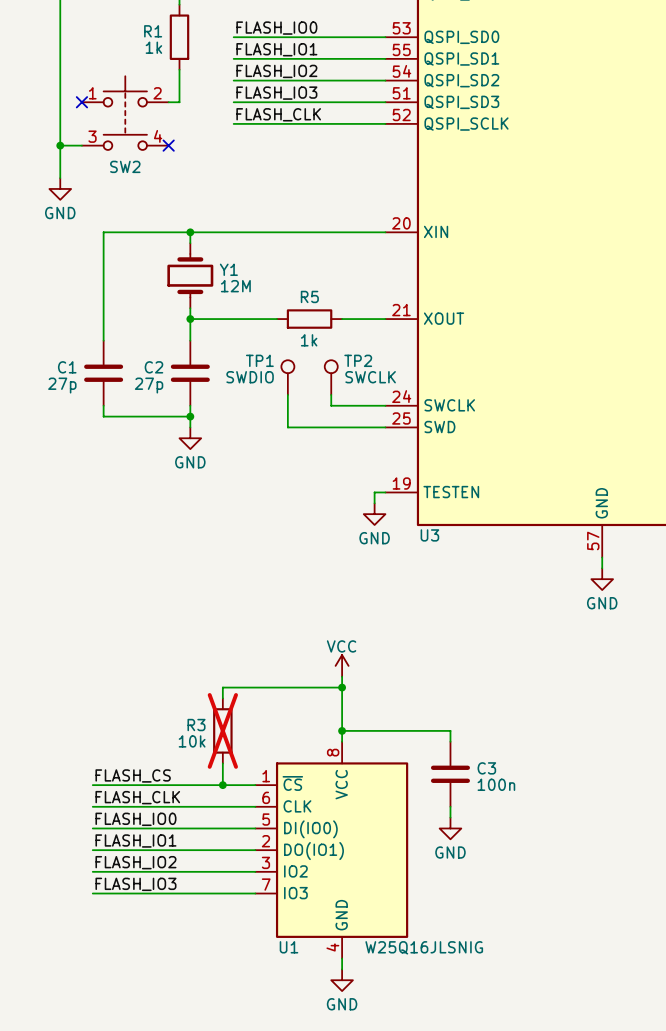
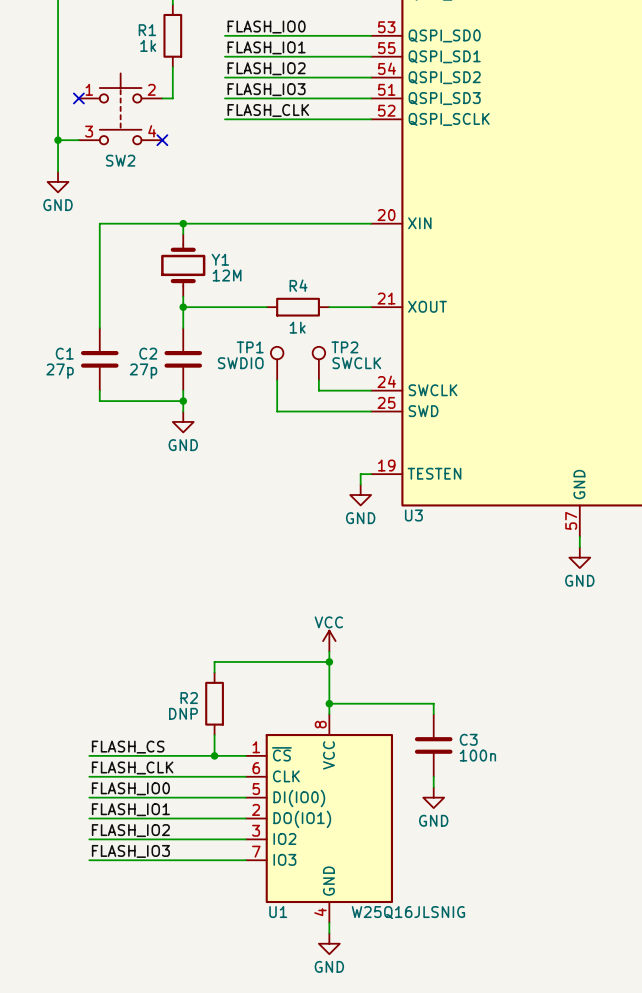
R5 name: R5 (309, 296) -> R4 (298, 285)
R3 name: R3 (196, 725) -> R2 (189, 698)
R3 do-not-place cross: (222, 730) -> none
R3 value: 10k (192, 741) -> DNP (183, 713)

